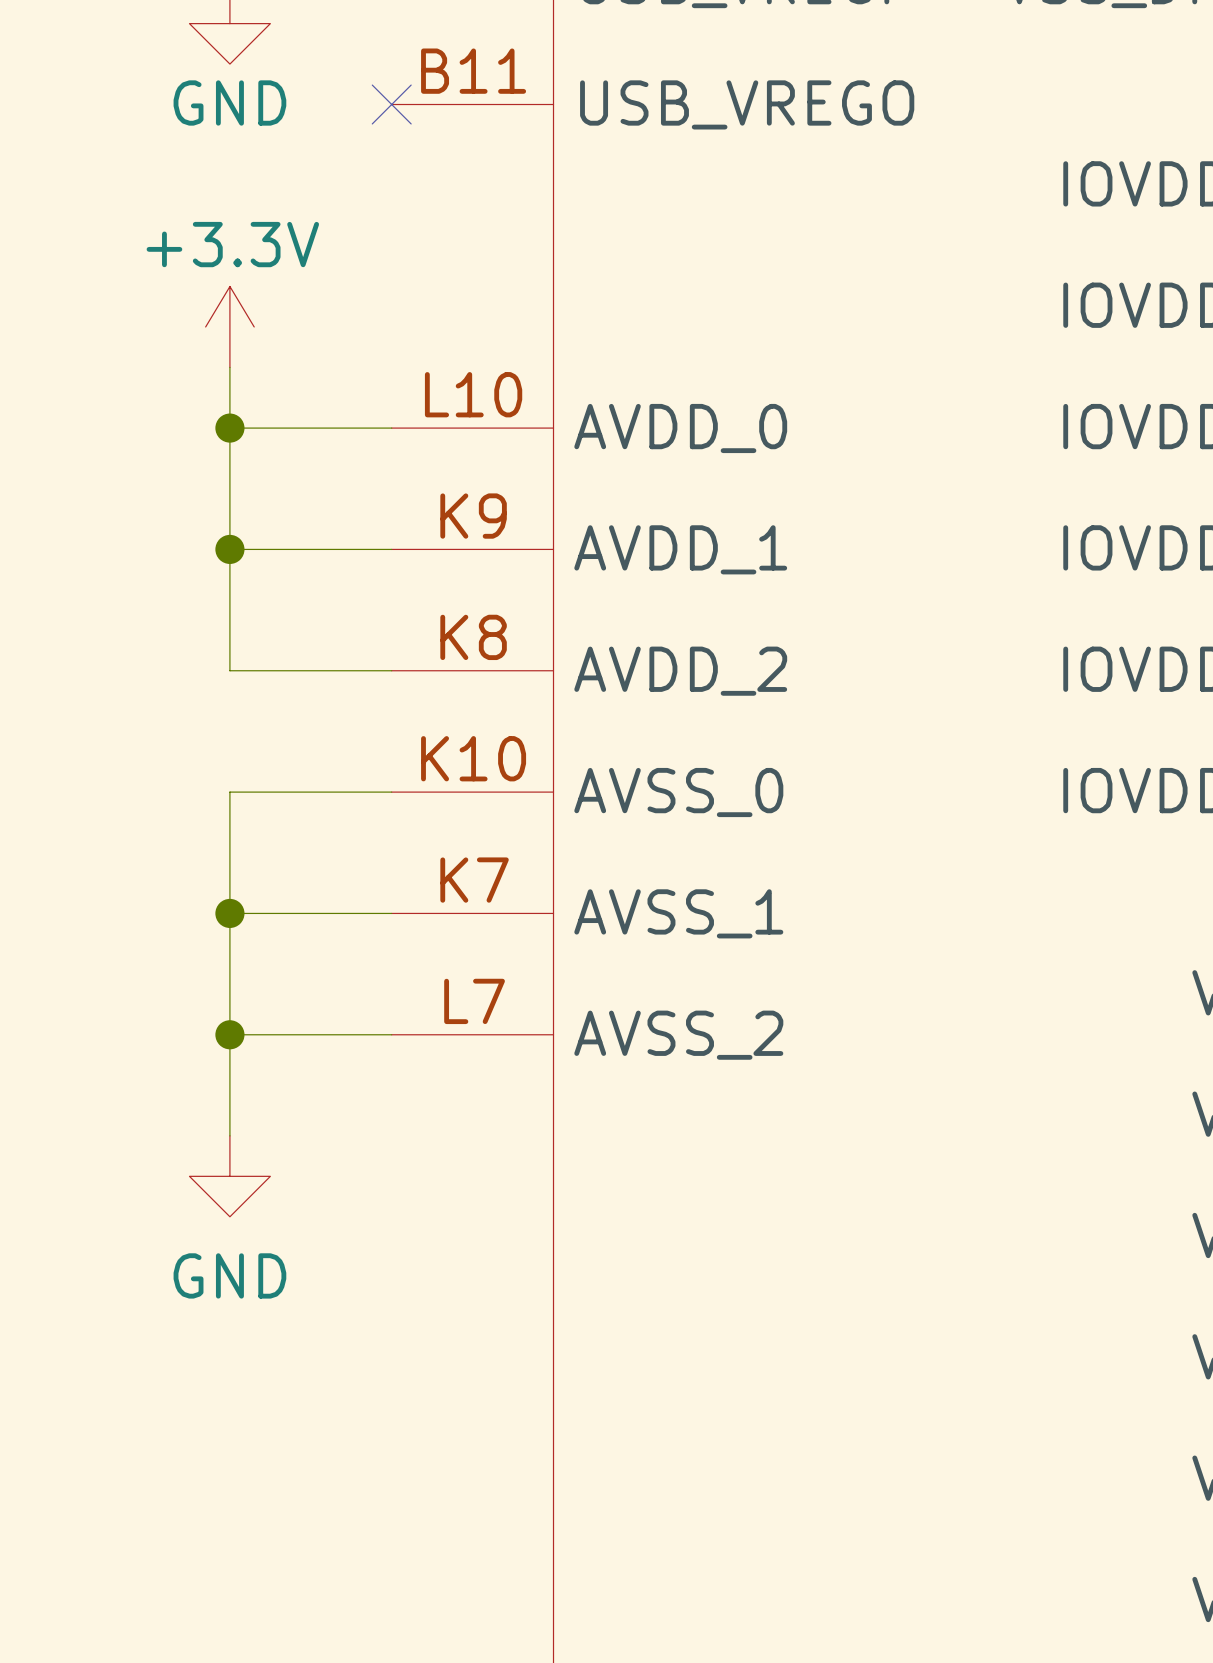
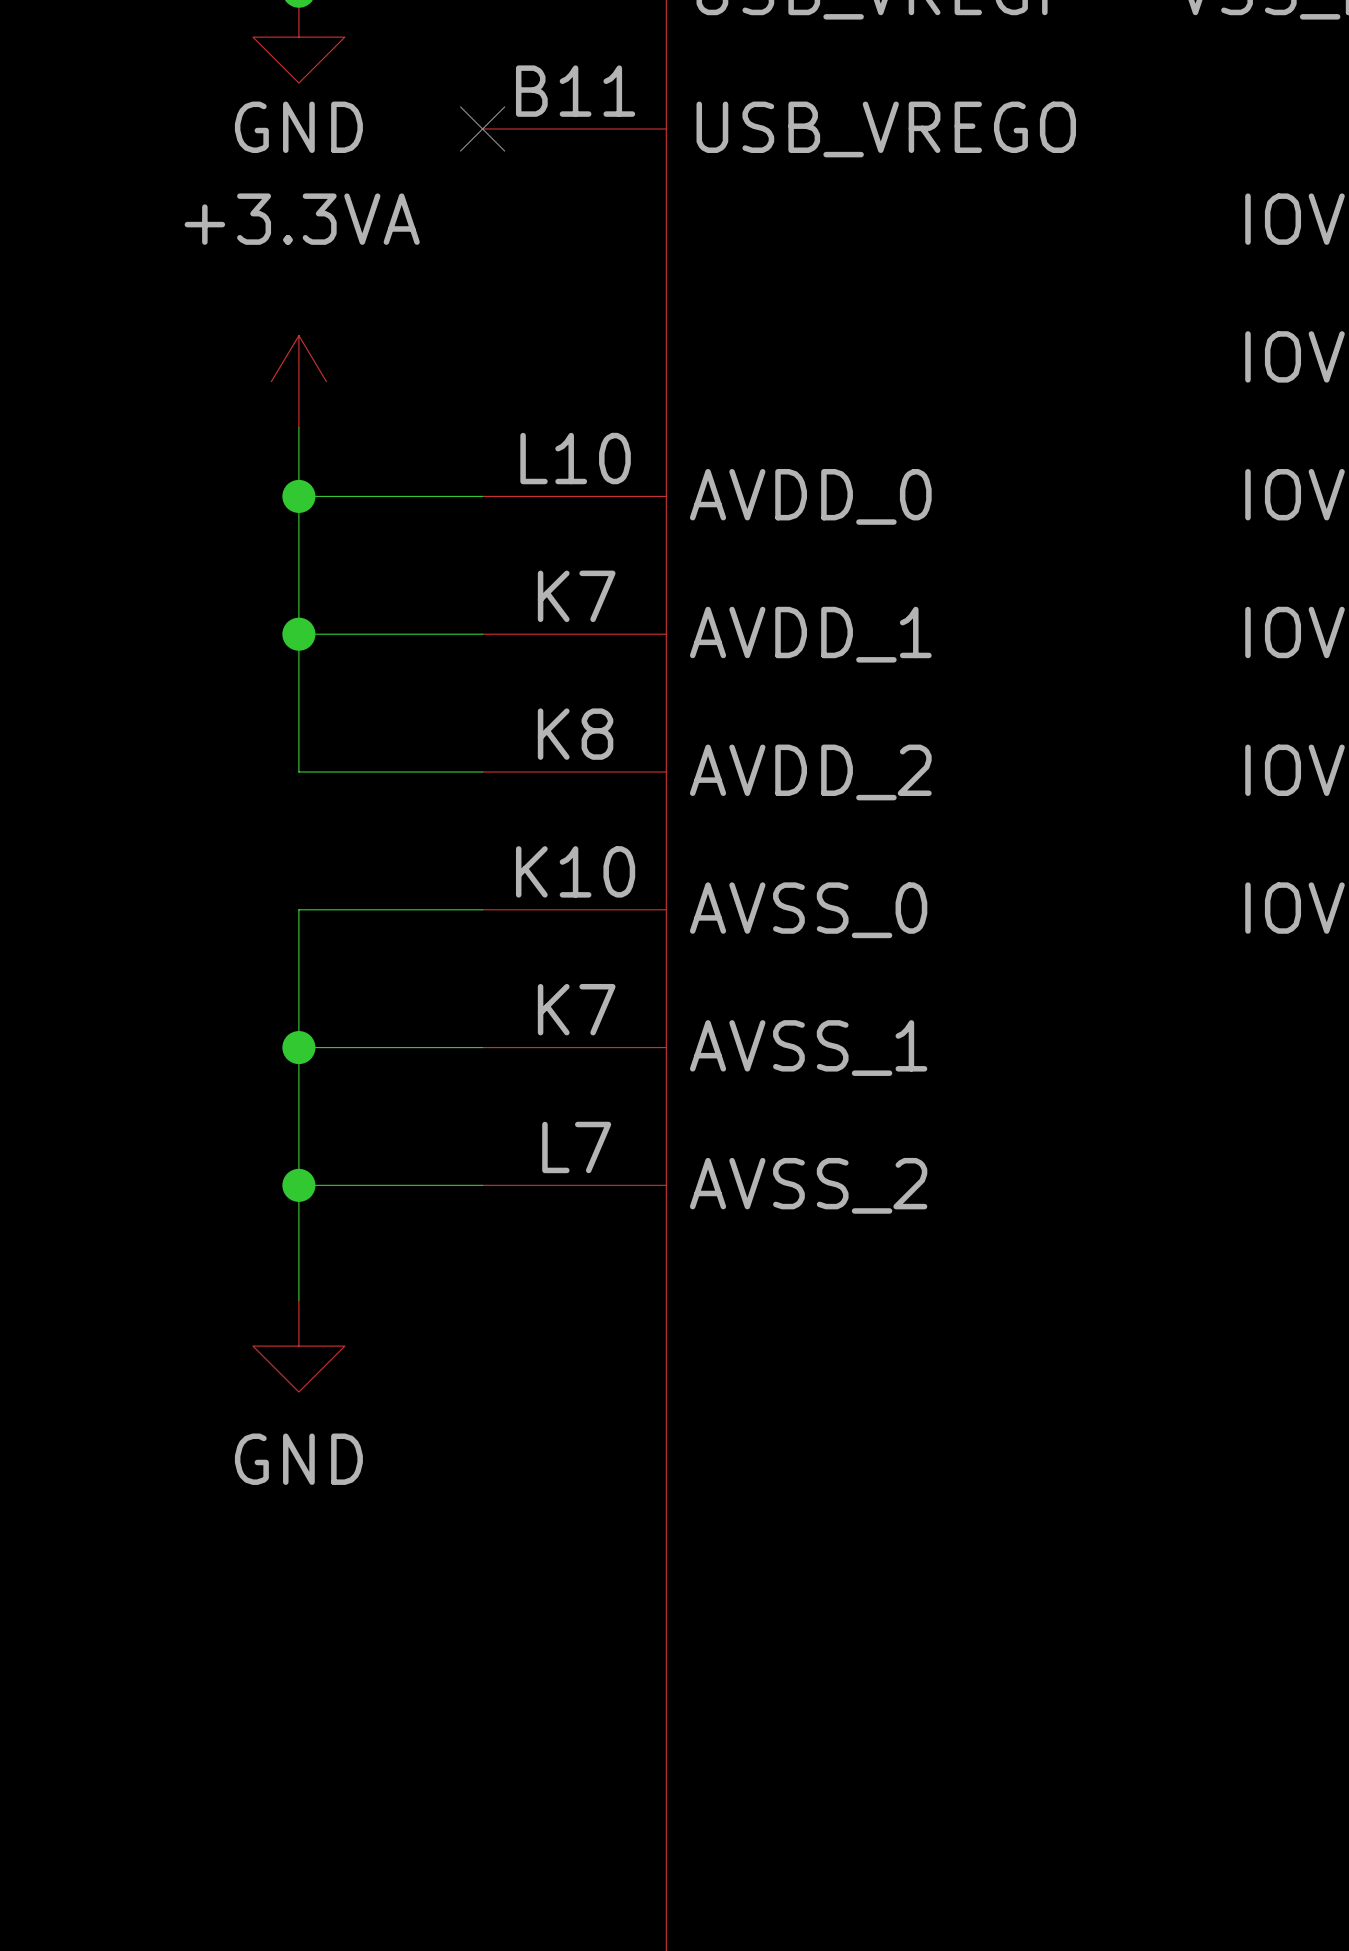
power symbol: +3.3V (229, 326) -> +3.3VA (298, 381)
part pin number: K9 (473, 516) -> K7 (576, 596)

